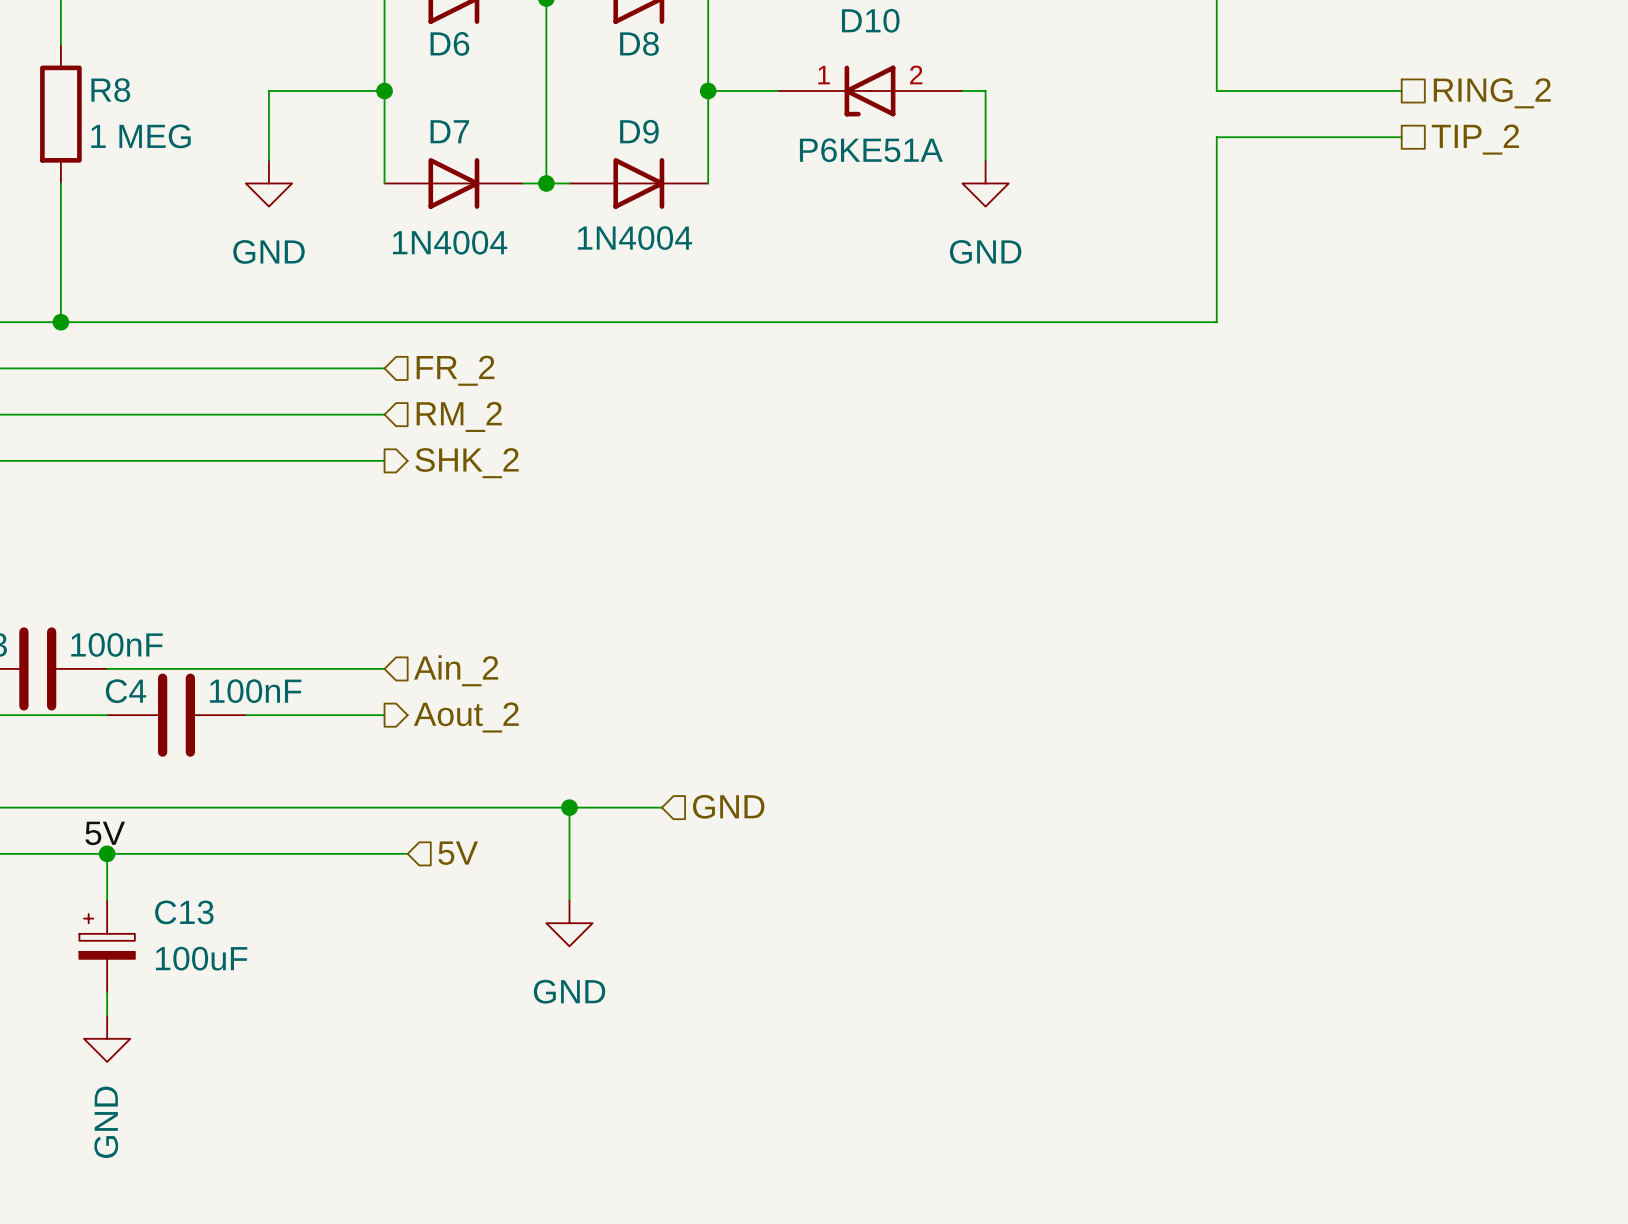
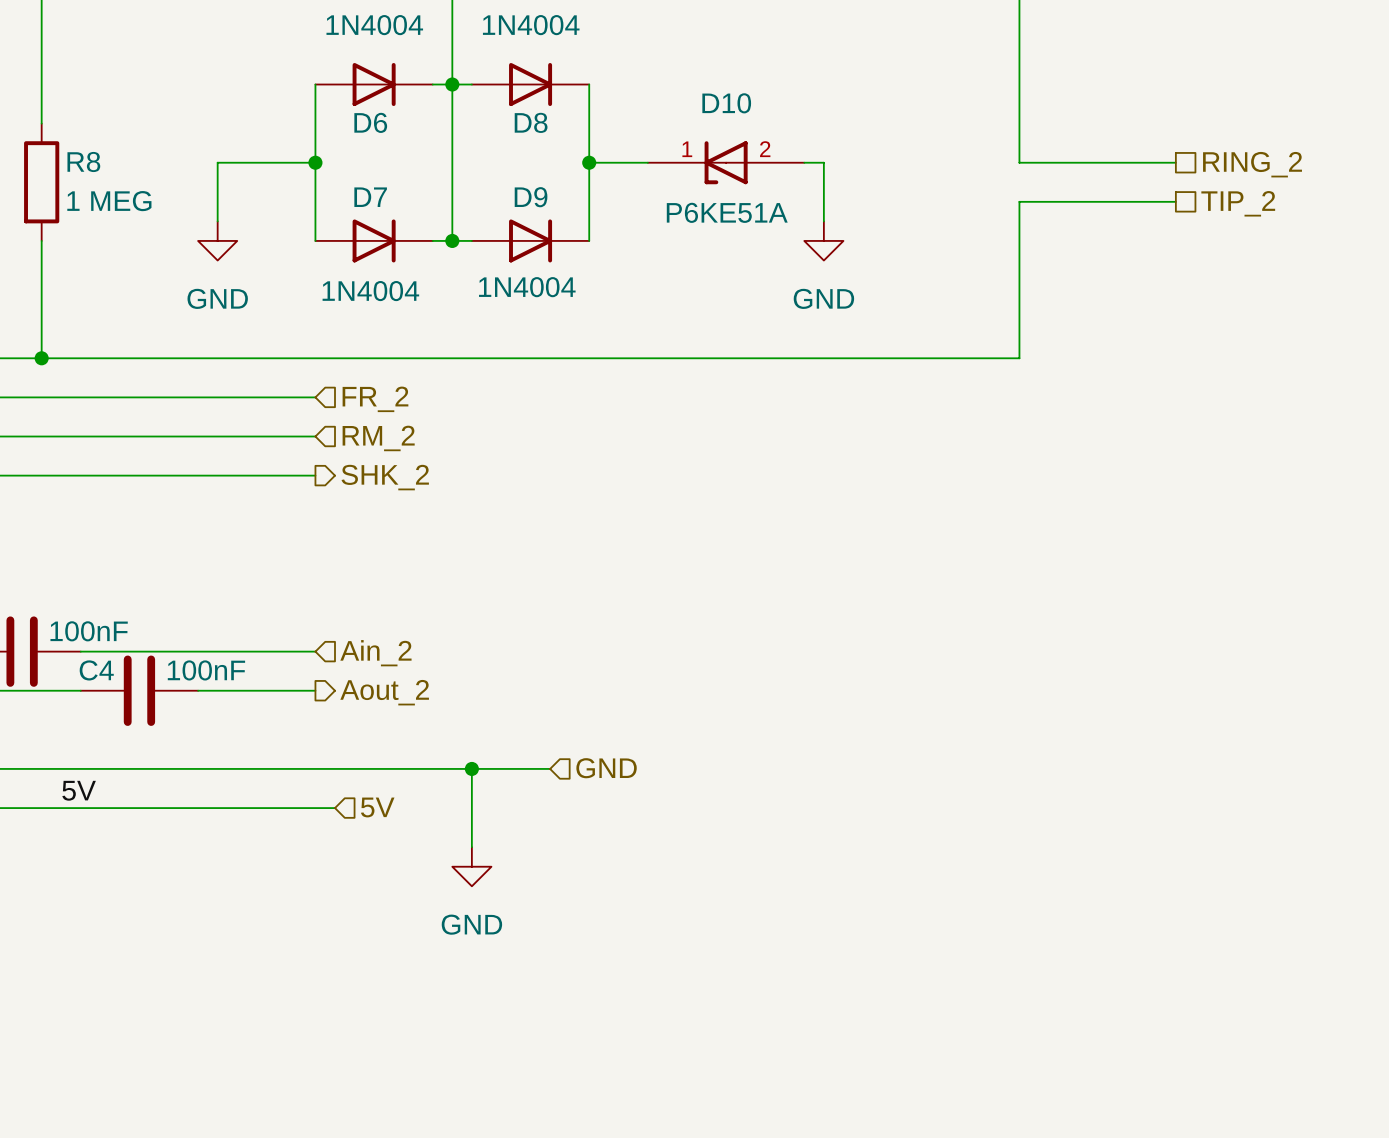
wire: (107, 853) (107, 900) -> none
junction: (107, 853) -> none
C13: 100uF (107, 946) -> none
wire: (107, 992) (107, 1015) -> none
power symbol: GND (107, 1038) -> none

